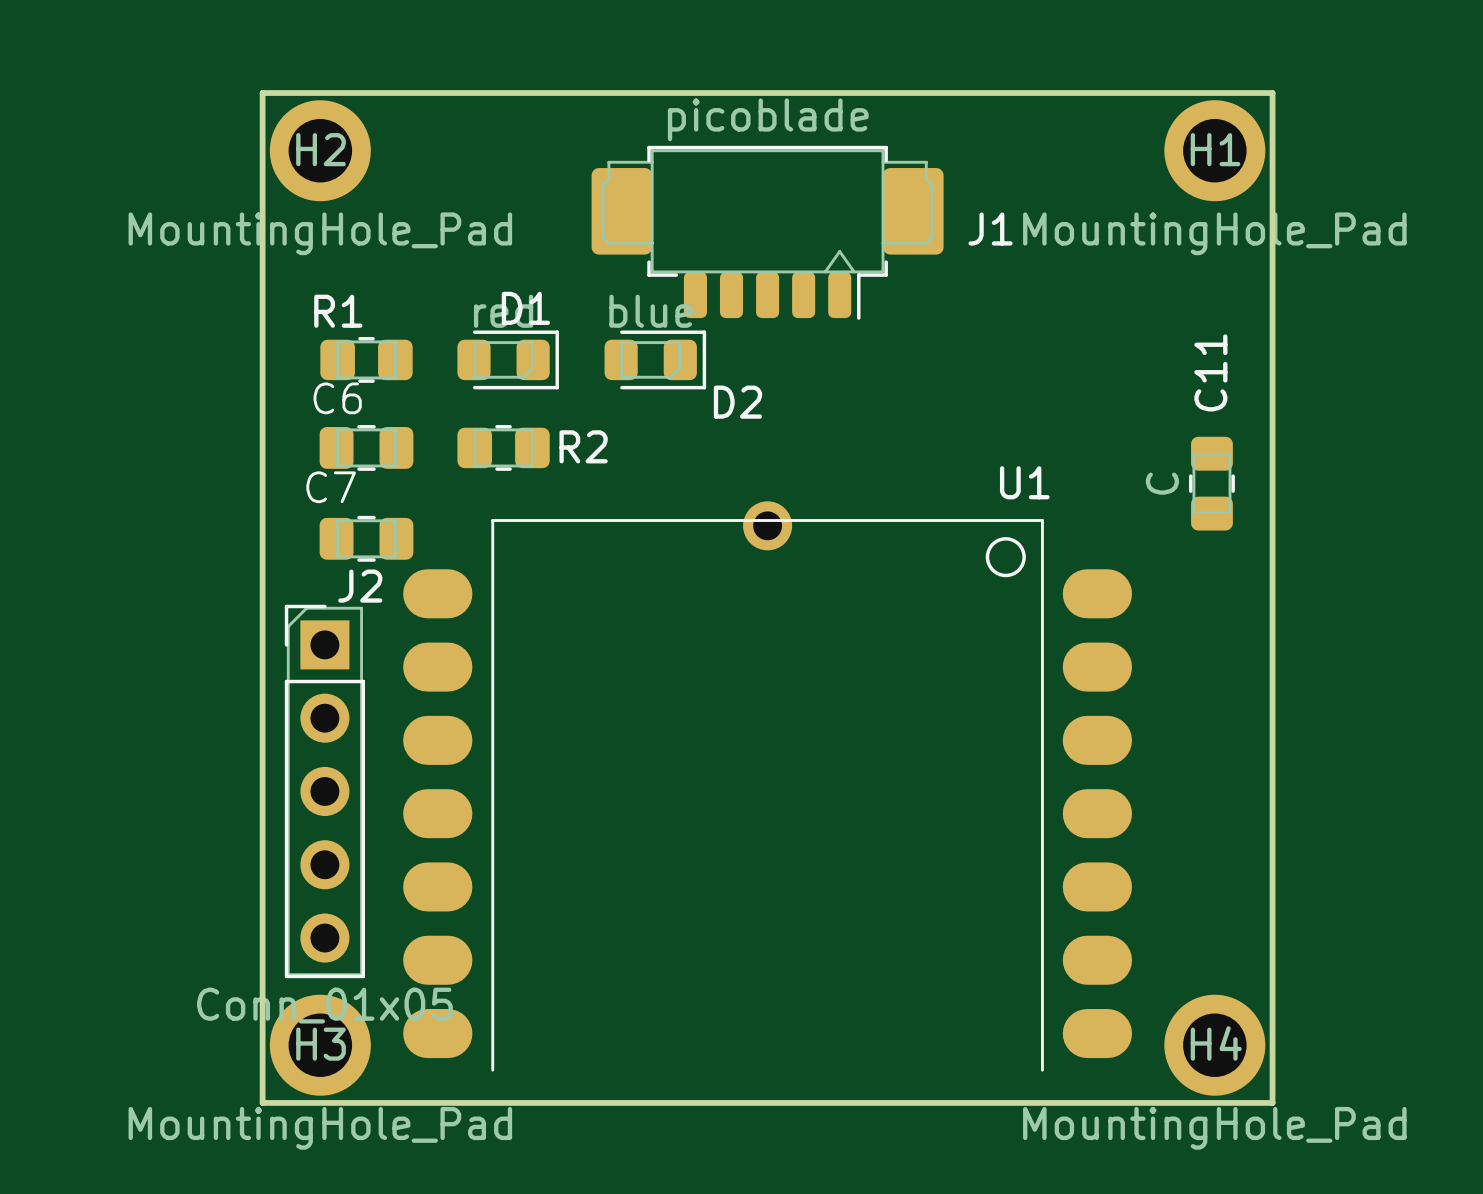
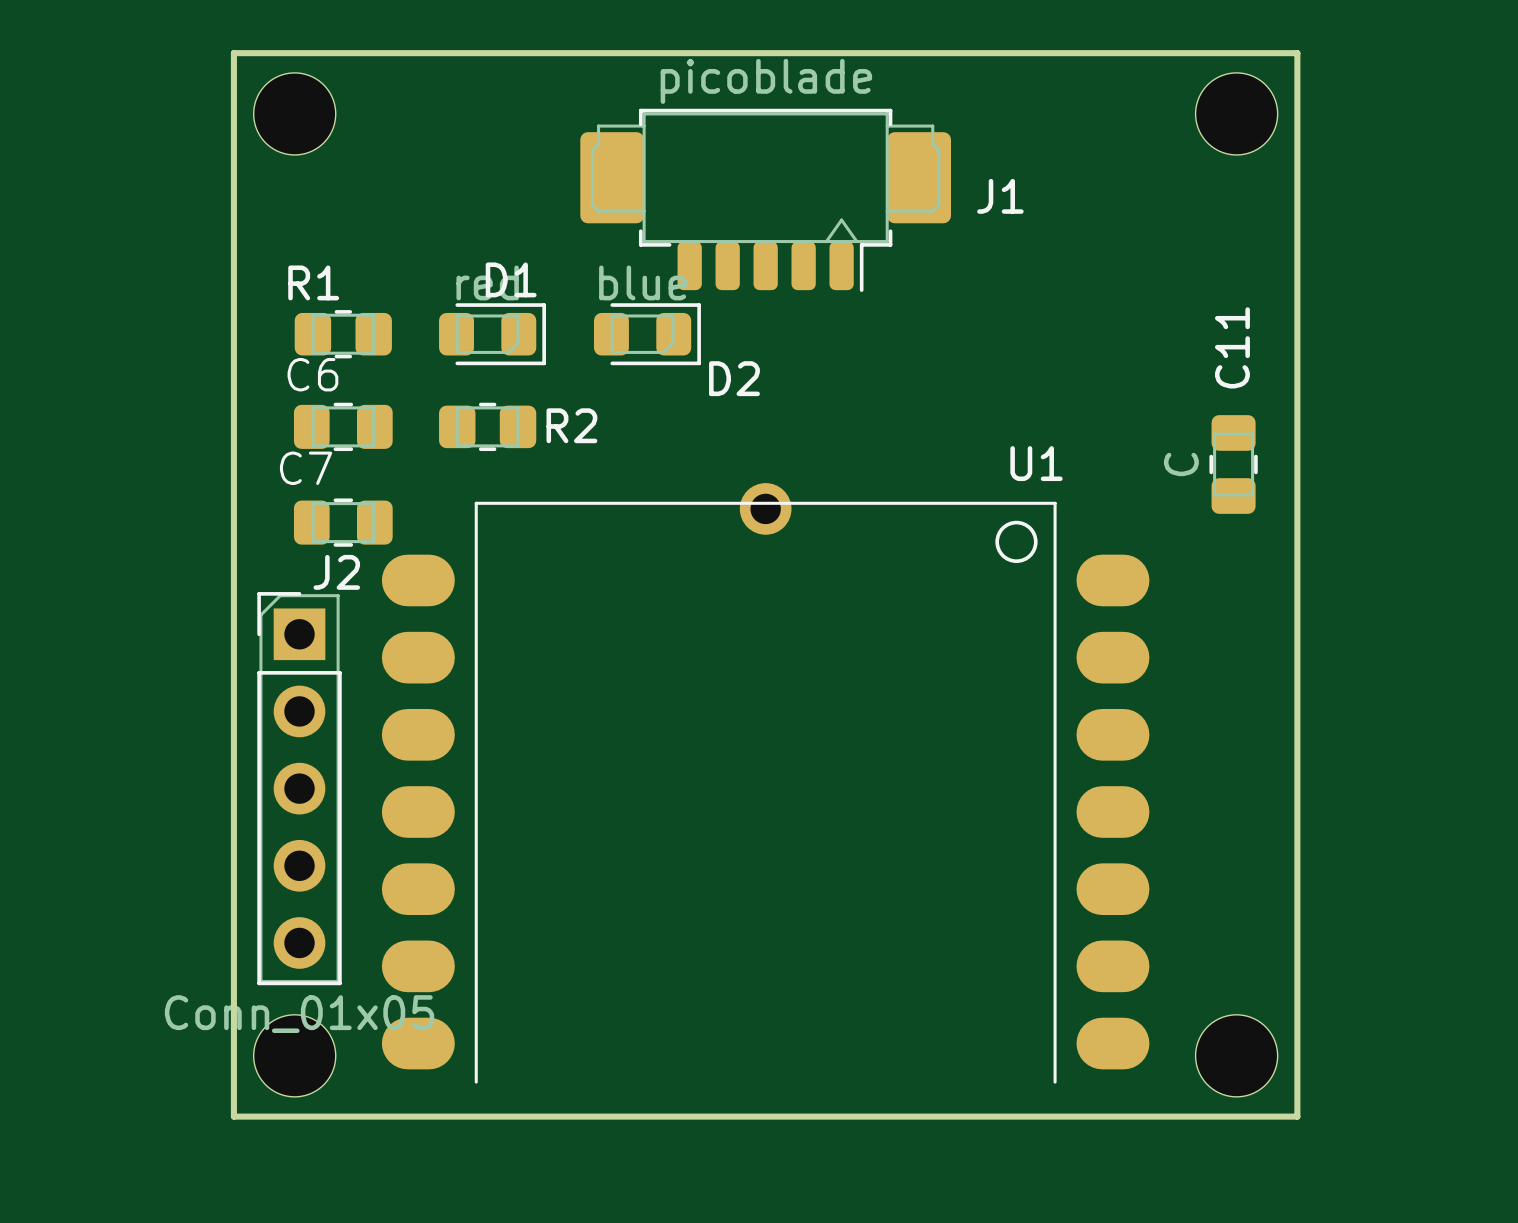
H2: MountingHole_Pad (320, 150) -> none
part: none -> (294, 113)
H1: MountingHole_Pad (1214, 150) -> none
part: none -> (1236, 113)
H3: MountingHole_Pad (320, 1045) -> none
part: none -> (294, 1055)
H4: MountingHole_Pad (1214, 1045) -> none
part: none -> (1236, 1055)

